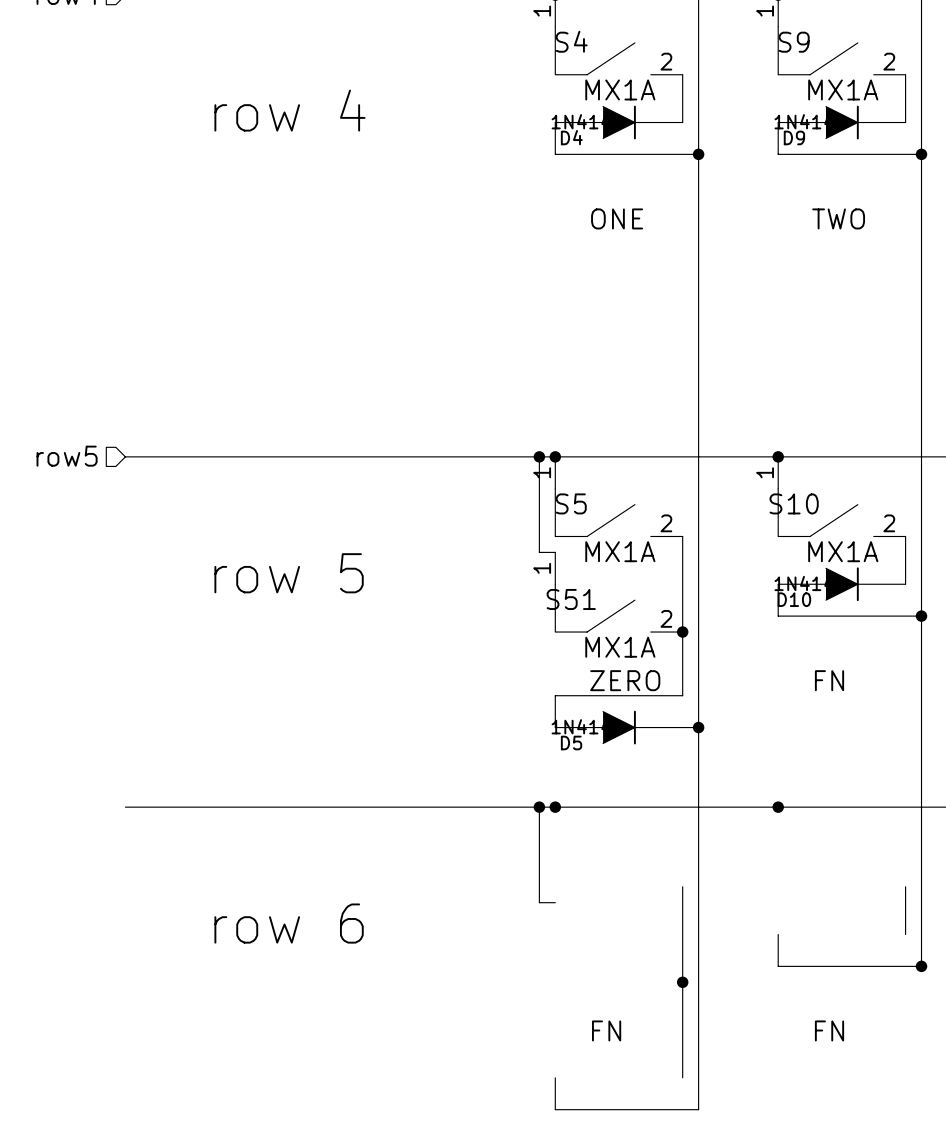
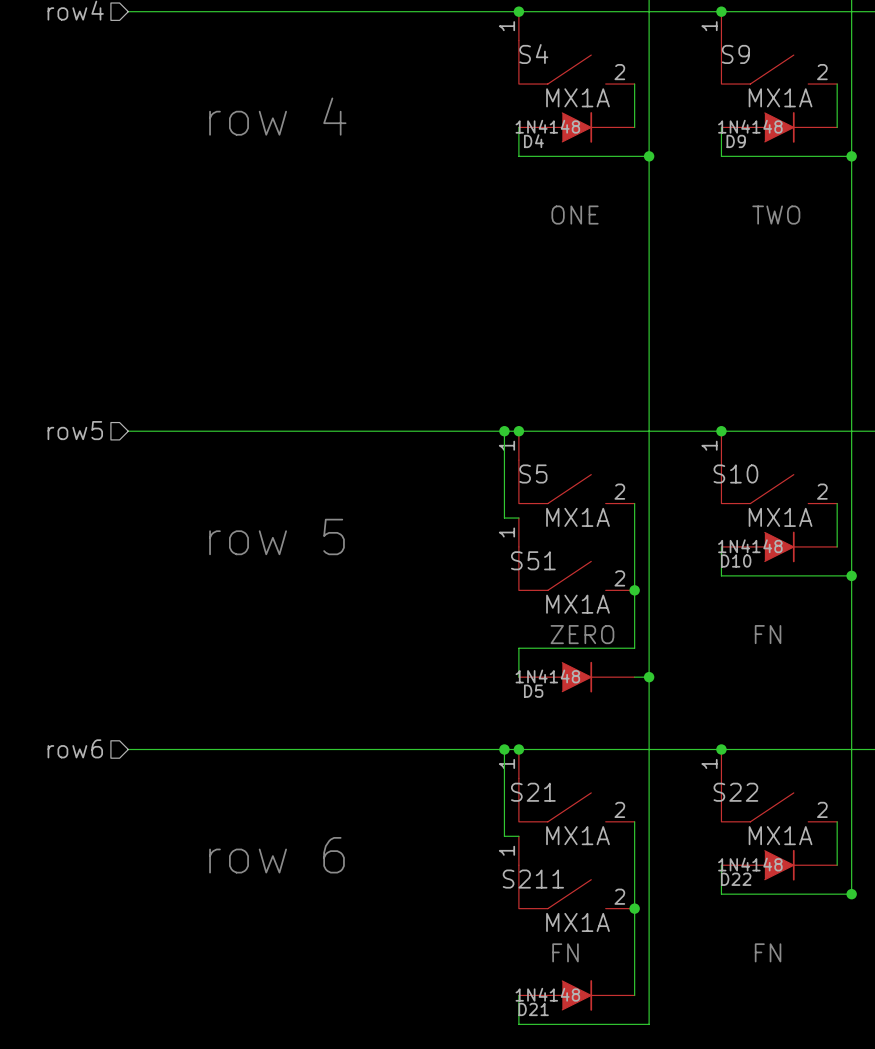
hierarchical label: none -> row6 (75, 748)
S21: none -> MX1A (576, 785)
S22: none -> MX1A (779, 785)
D22: none -> 1N4148 (779, 865)
S211: none -> MX1A (576, 872)
D21: none -> 1N4148 (576, 995)

